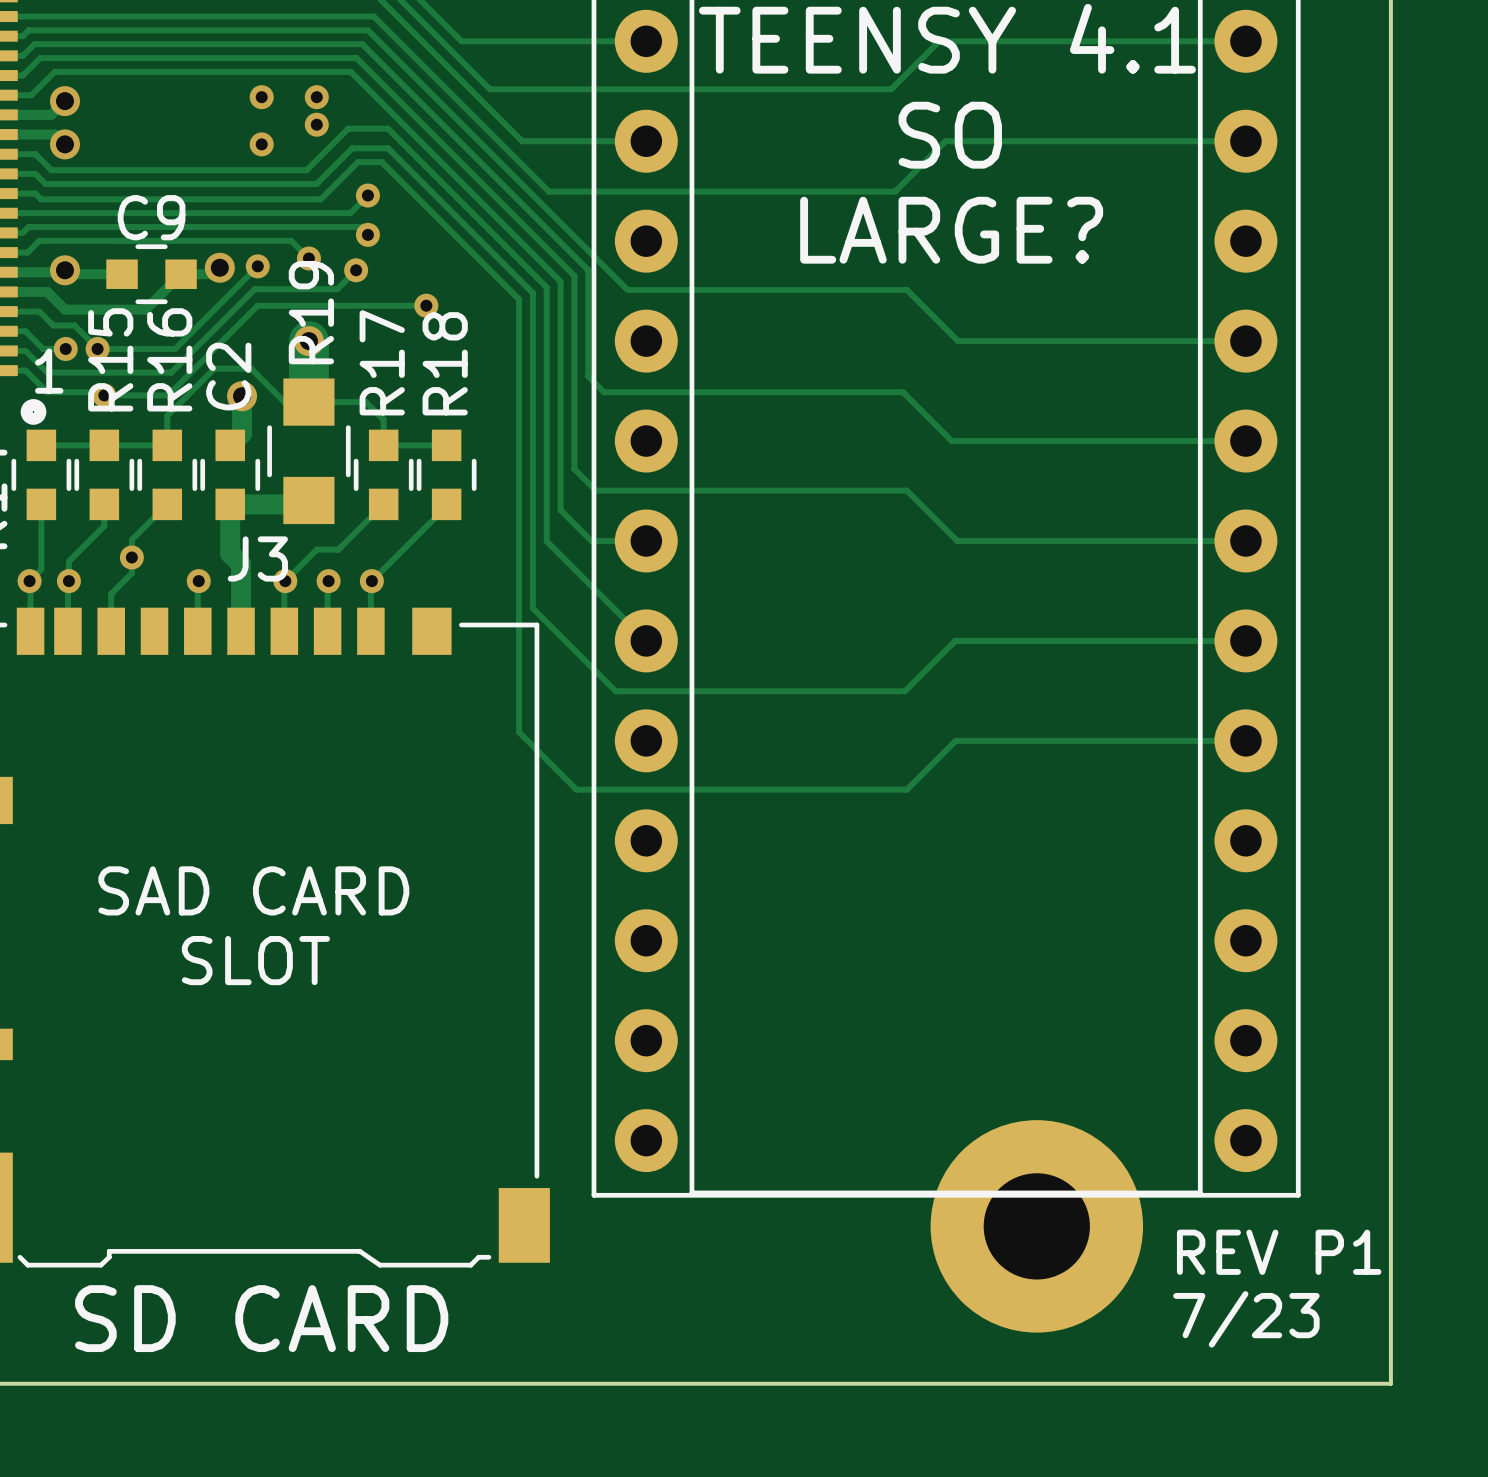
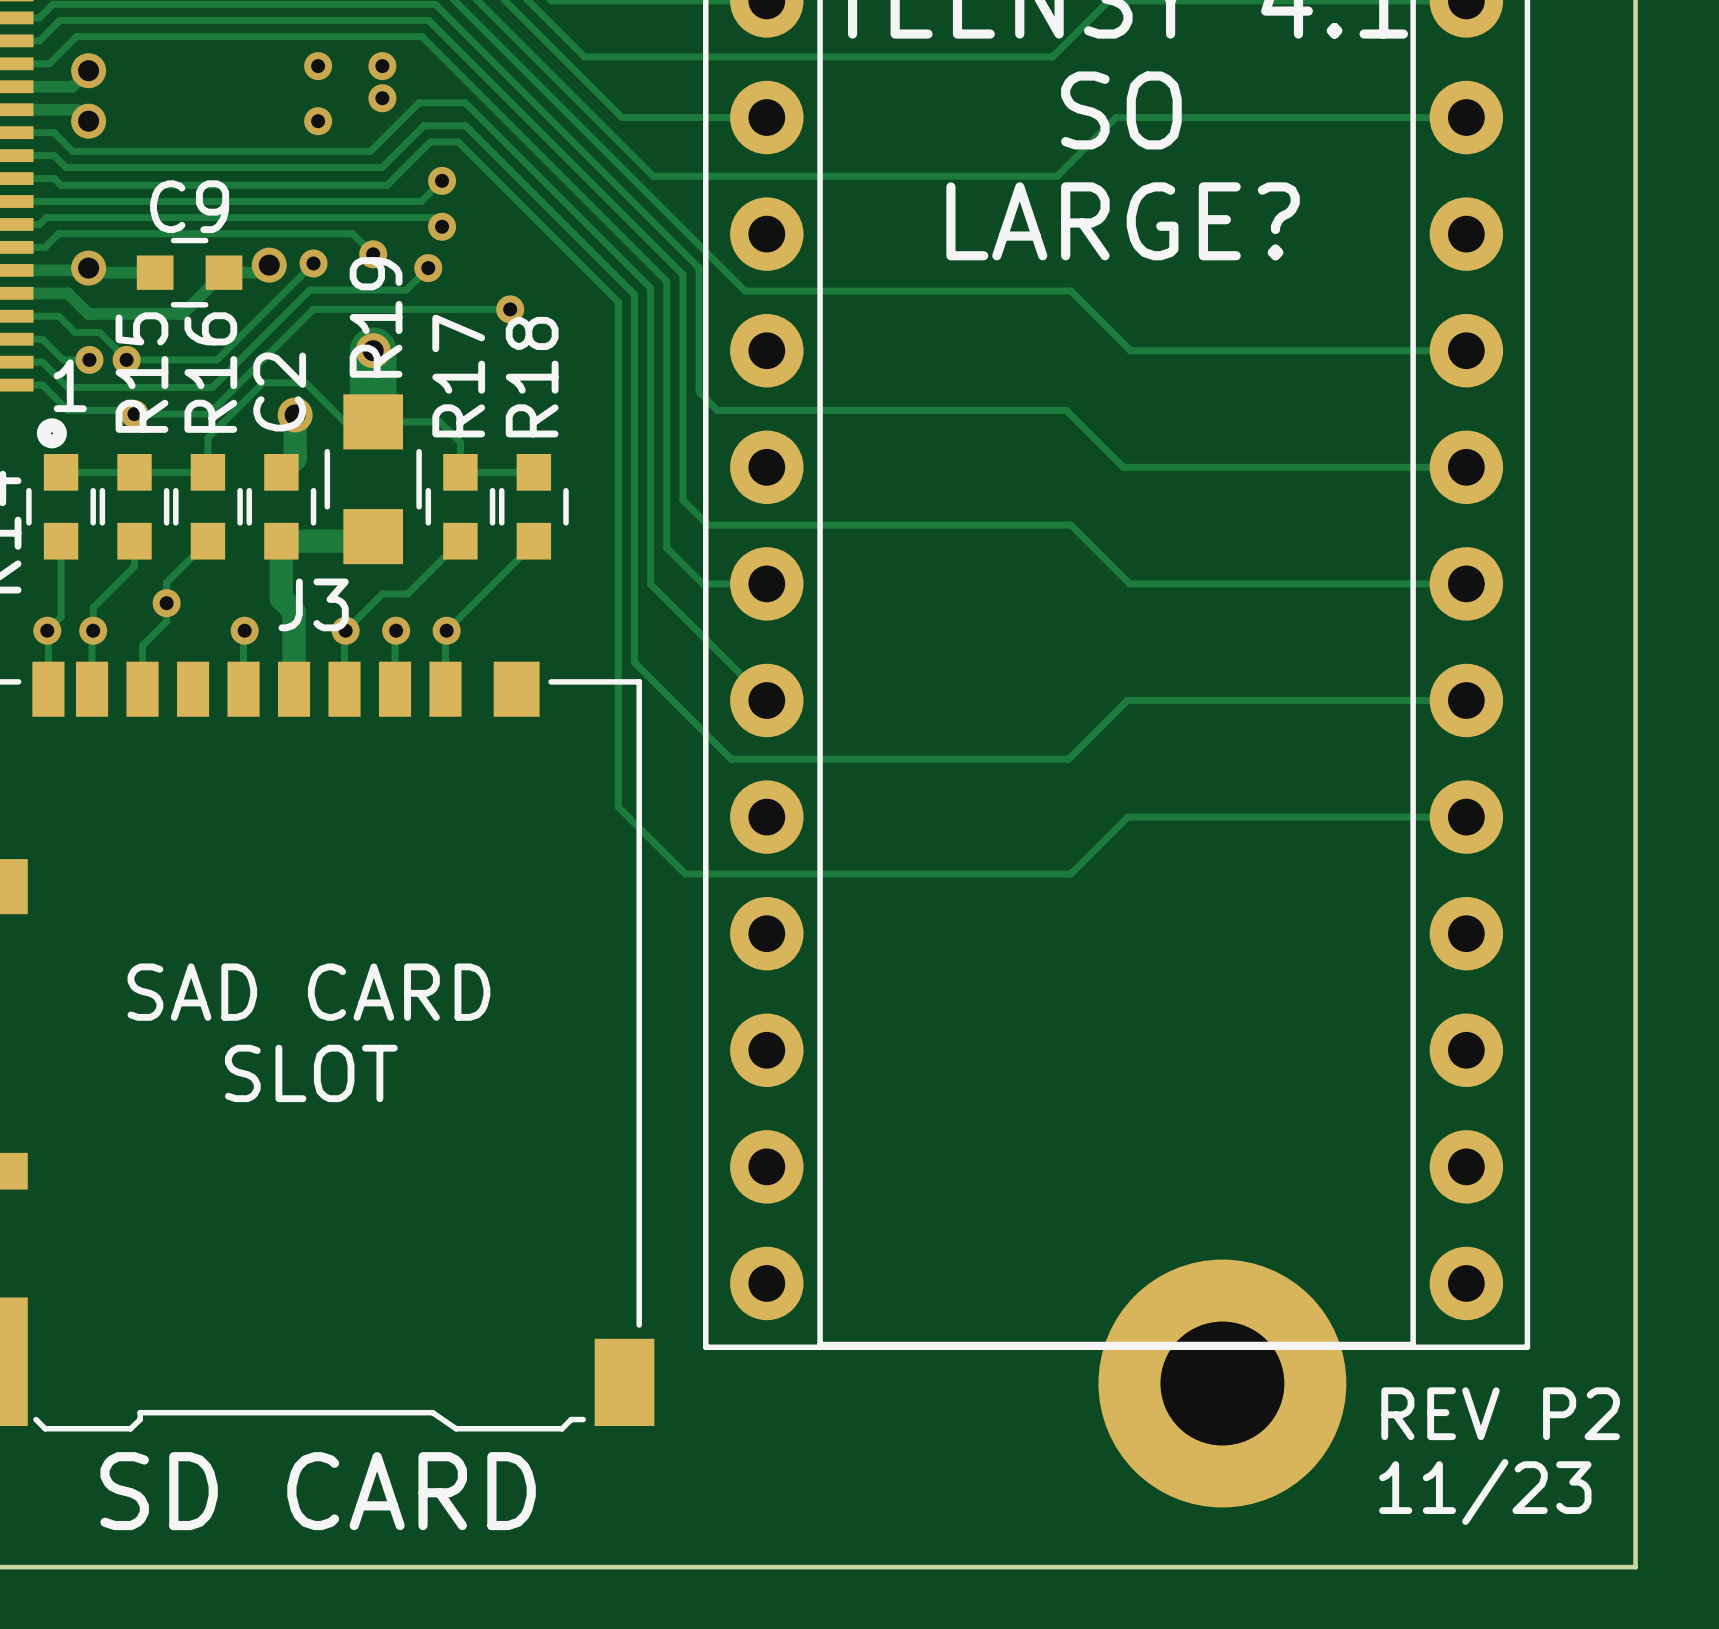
text: REV P1 (1279, 1252) -> REV P2 (1500, 1413)
text: 7/23 (1246, 1319) -> 11/23 (1485, 1491)

